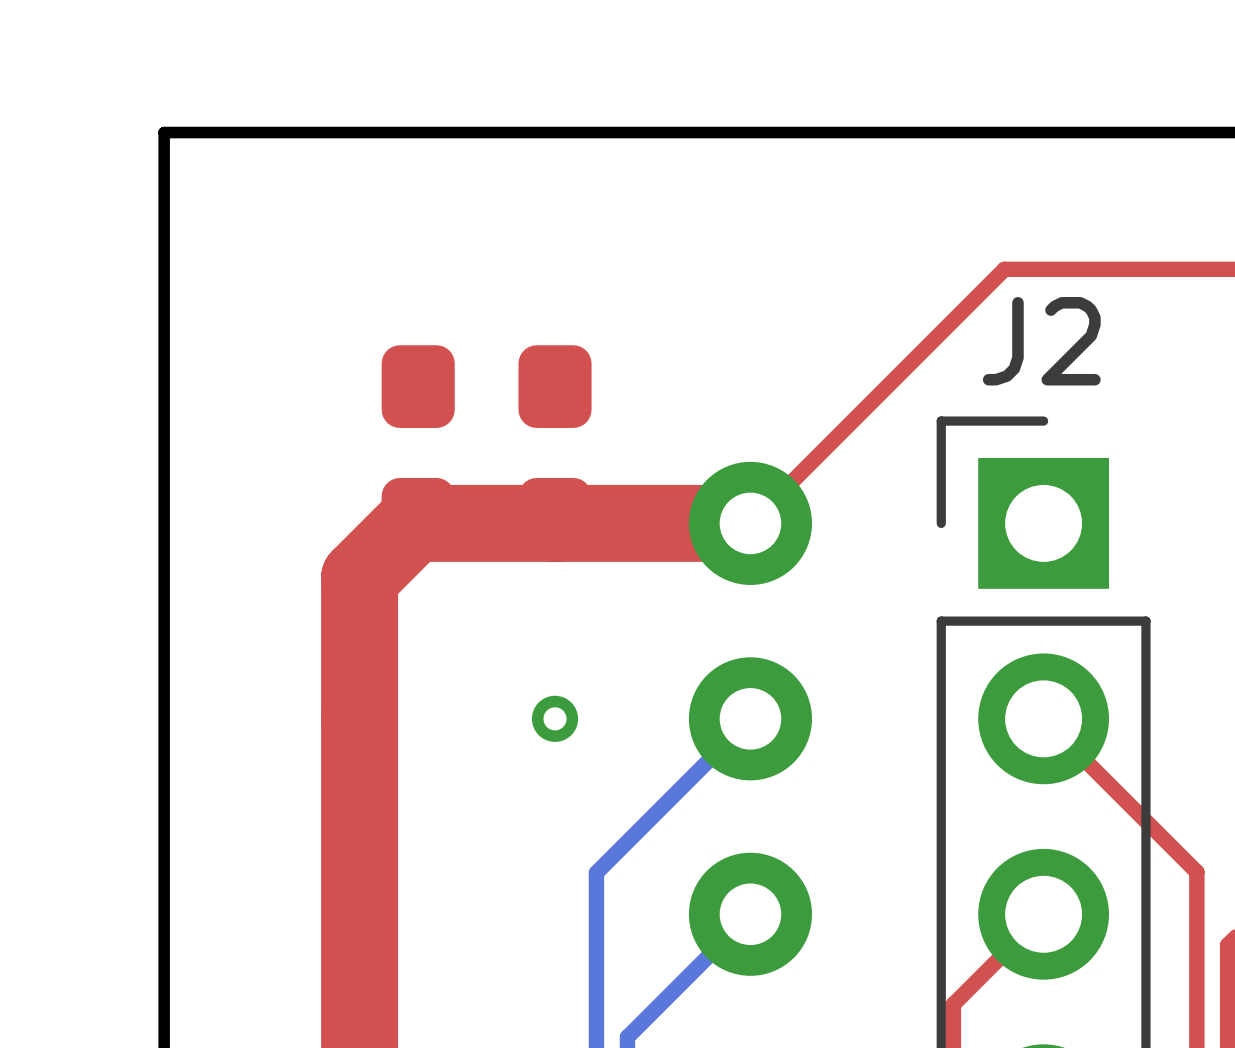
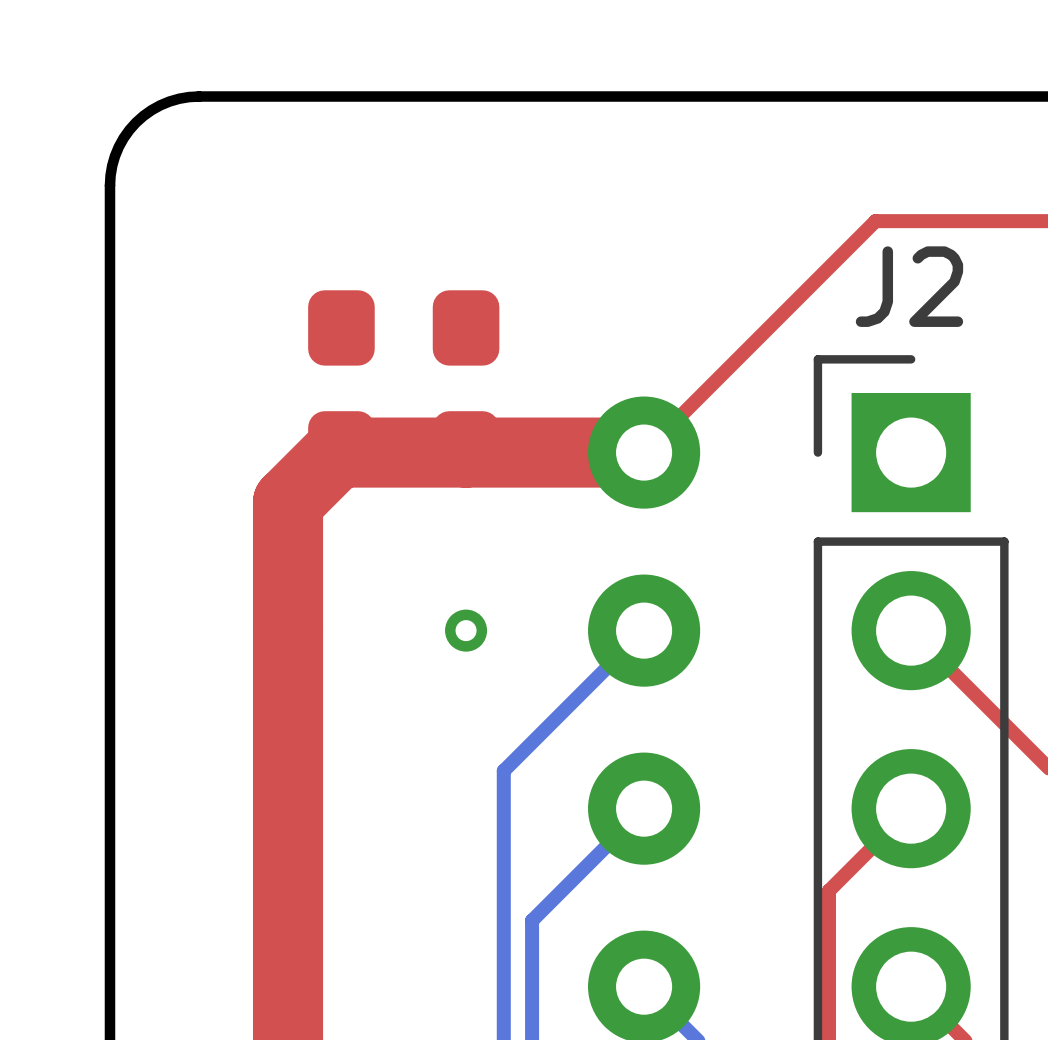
board edge: (261, 132) (164, 132) (164, 230) -> (199, 96) (179, 98) (160, 105) (136, 122) (118, 146) (112, 165) (109, 185)

